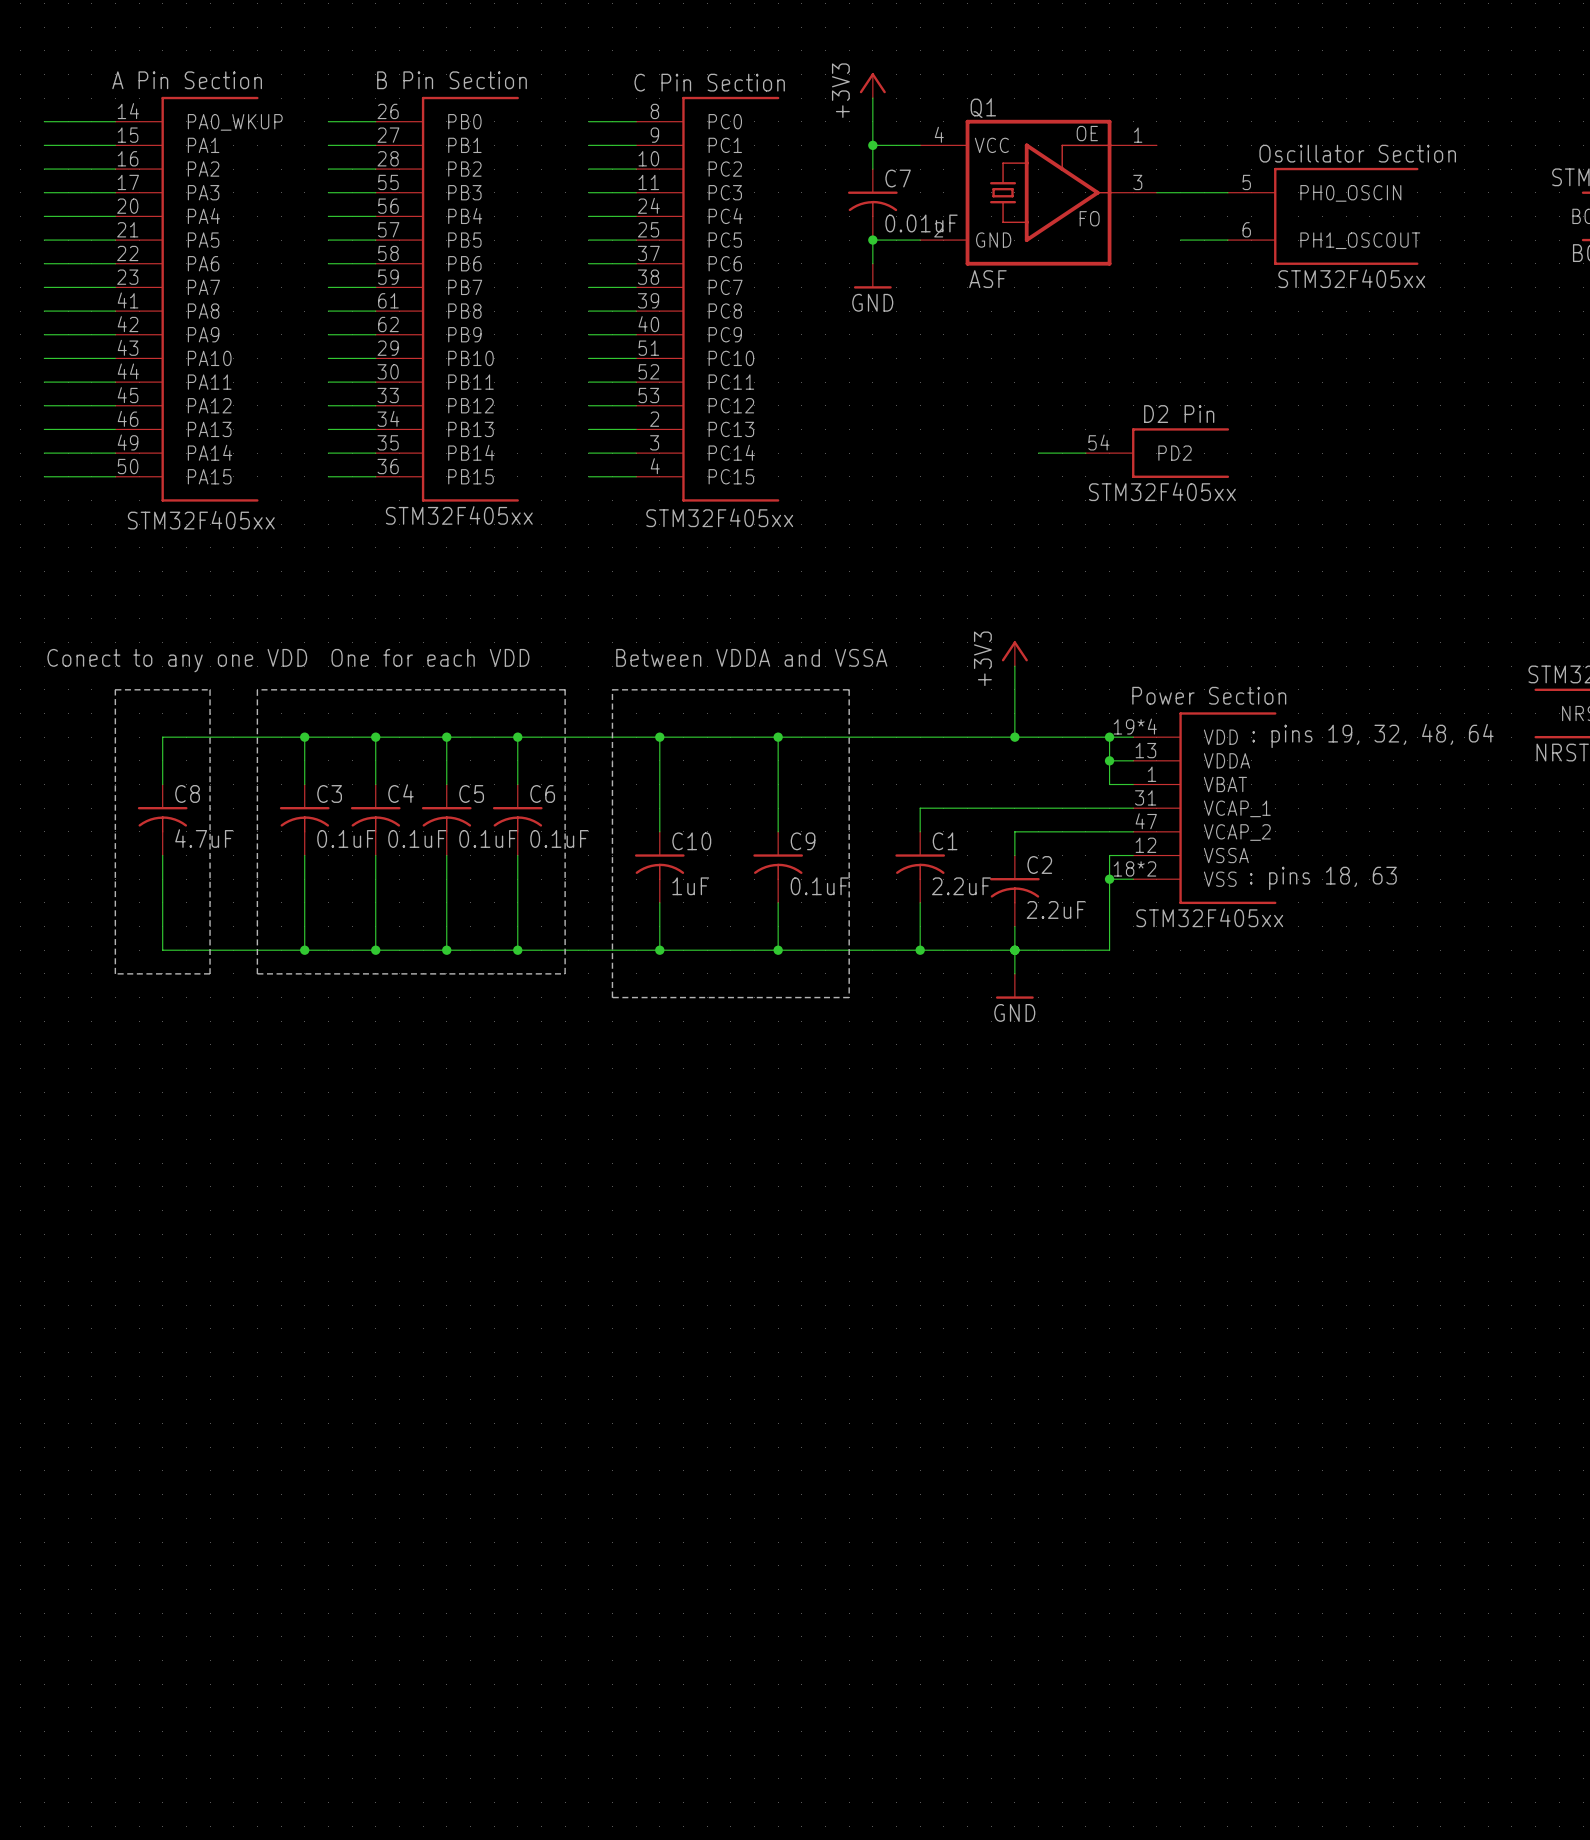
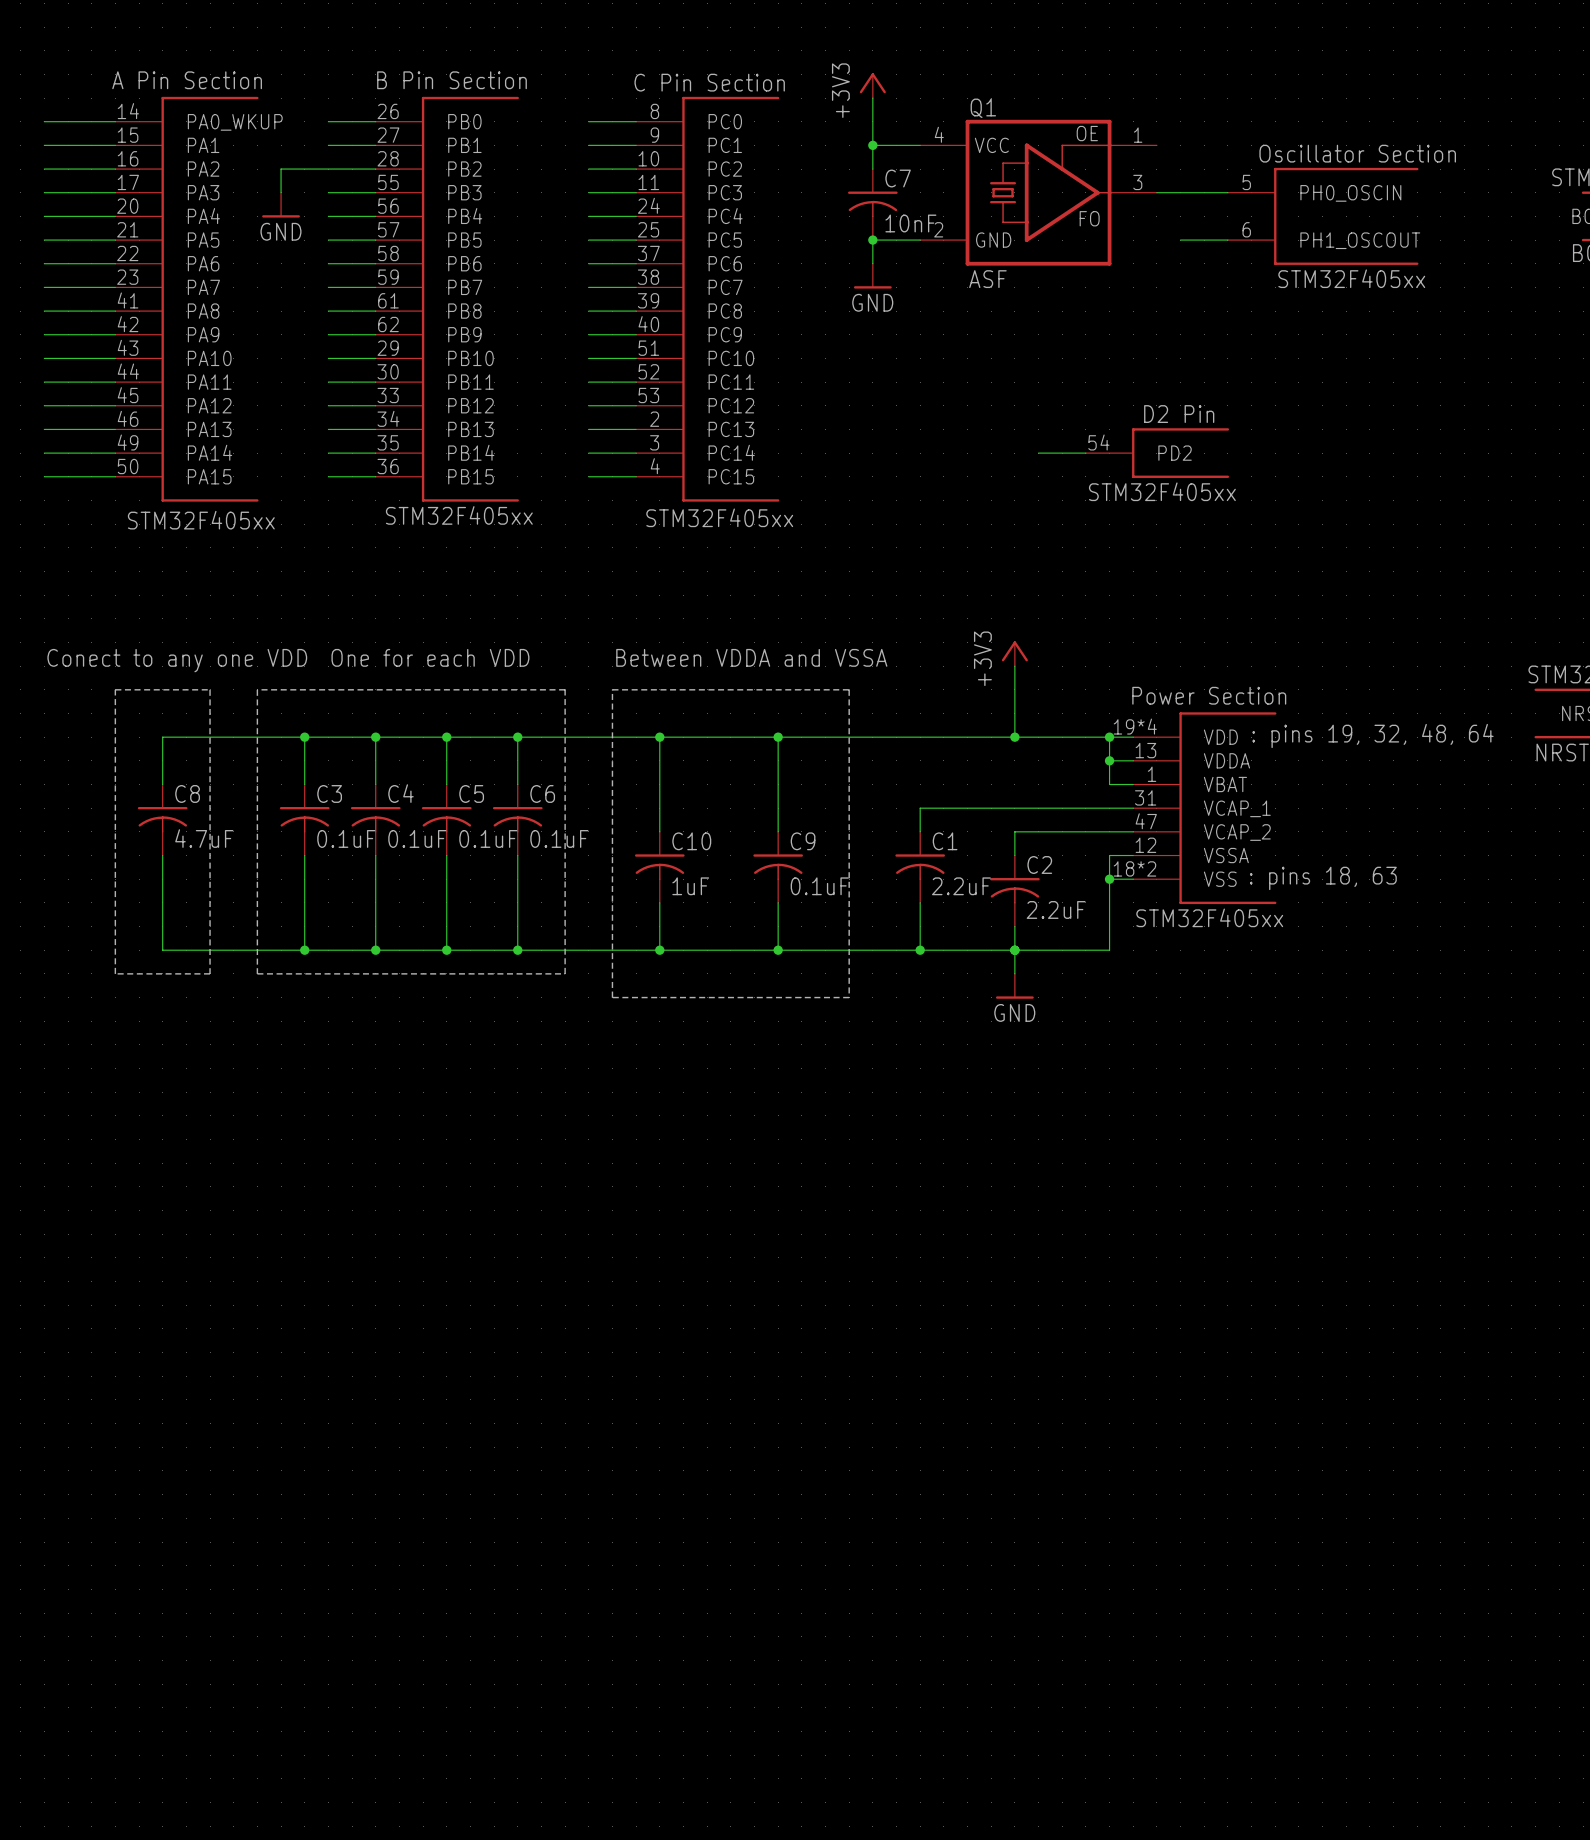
wire: none -> (328, 169) (281, 169) (281, 192)
power symbol: none -> GND (281, 205)
C7 value: 0.01uF (921, 223) -> 10nF (910, 223)

